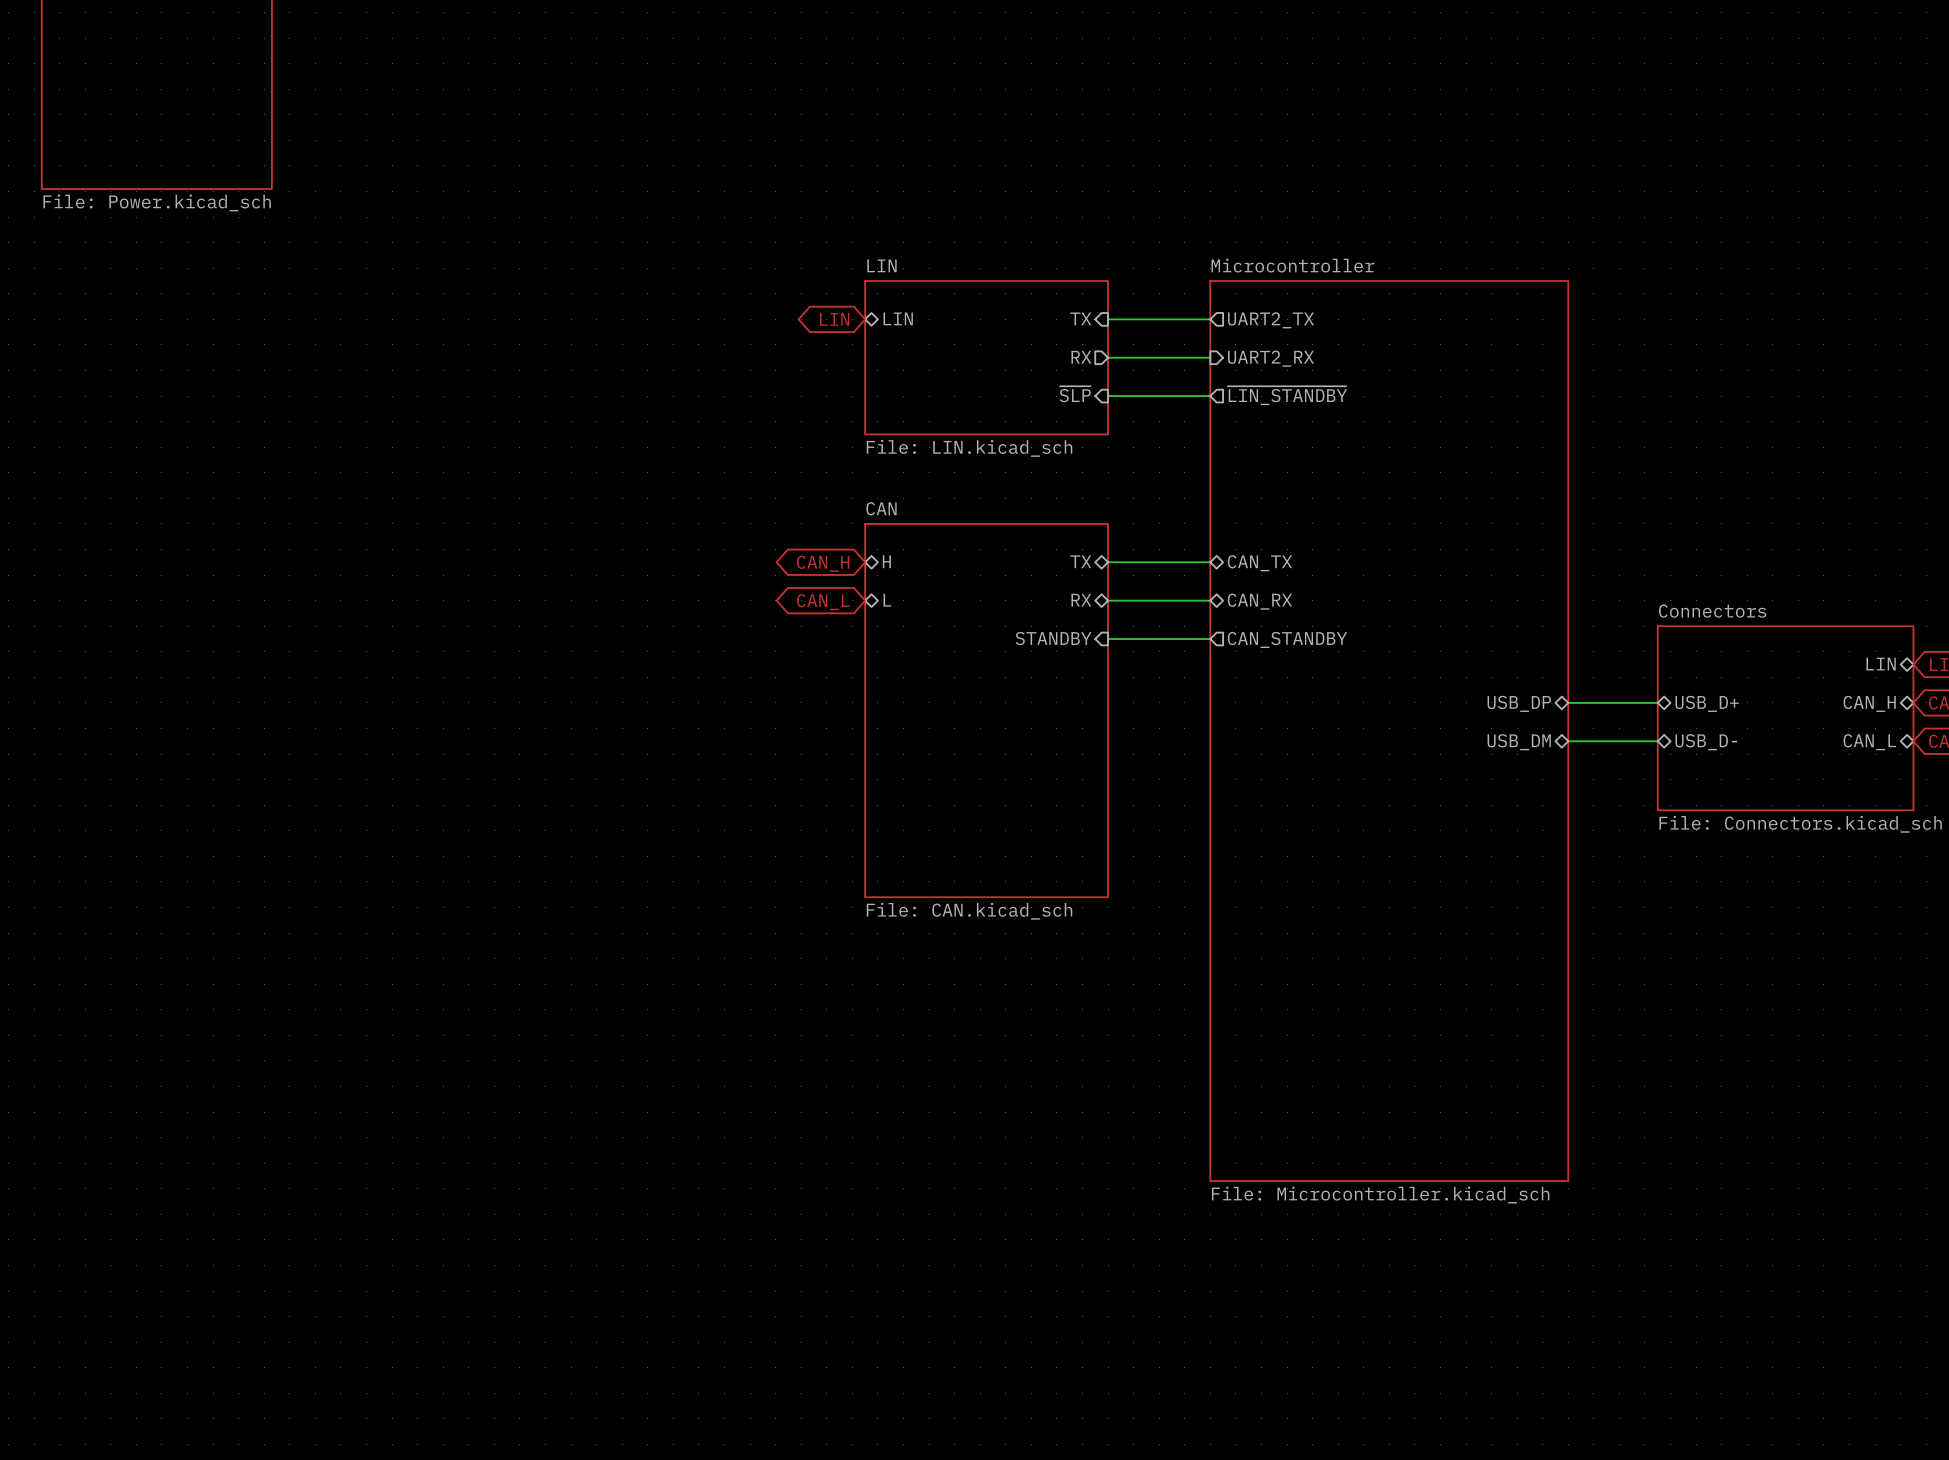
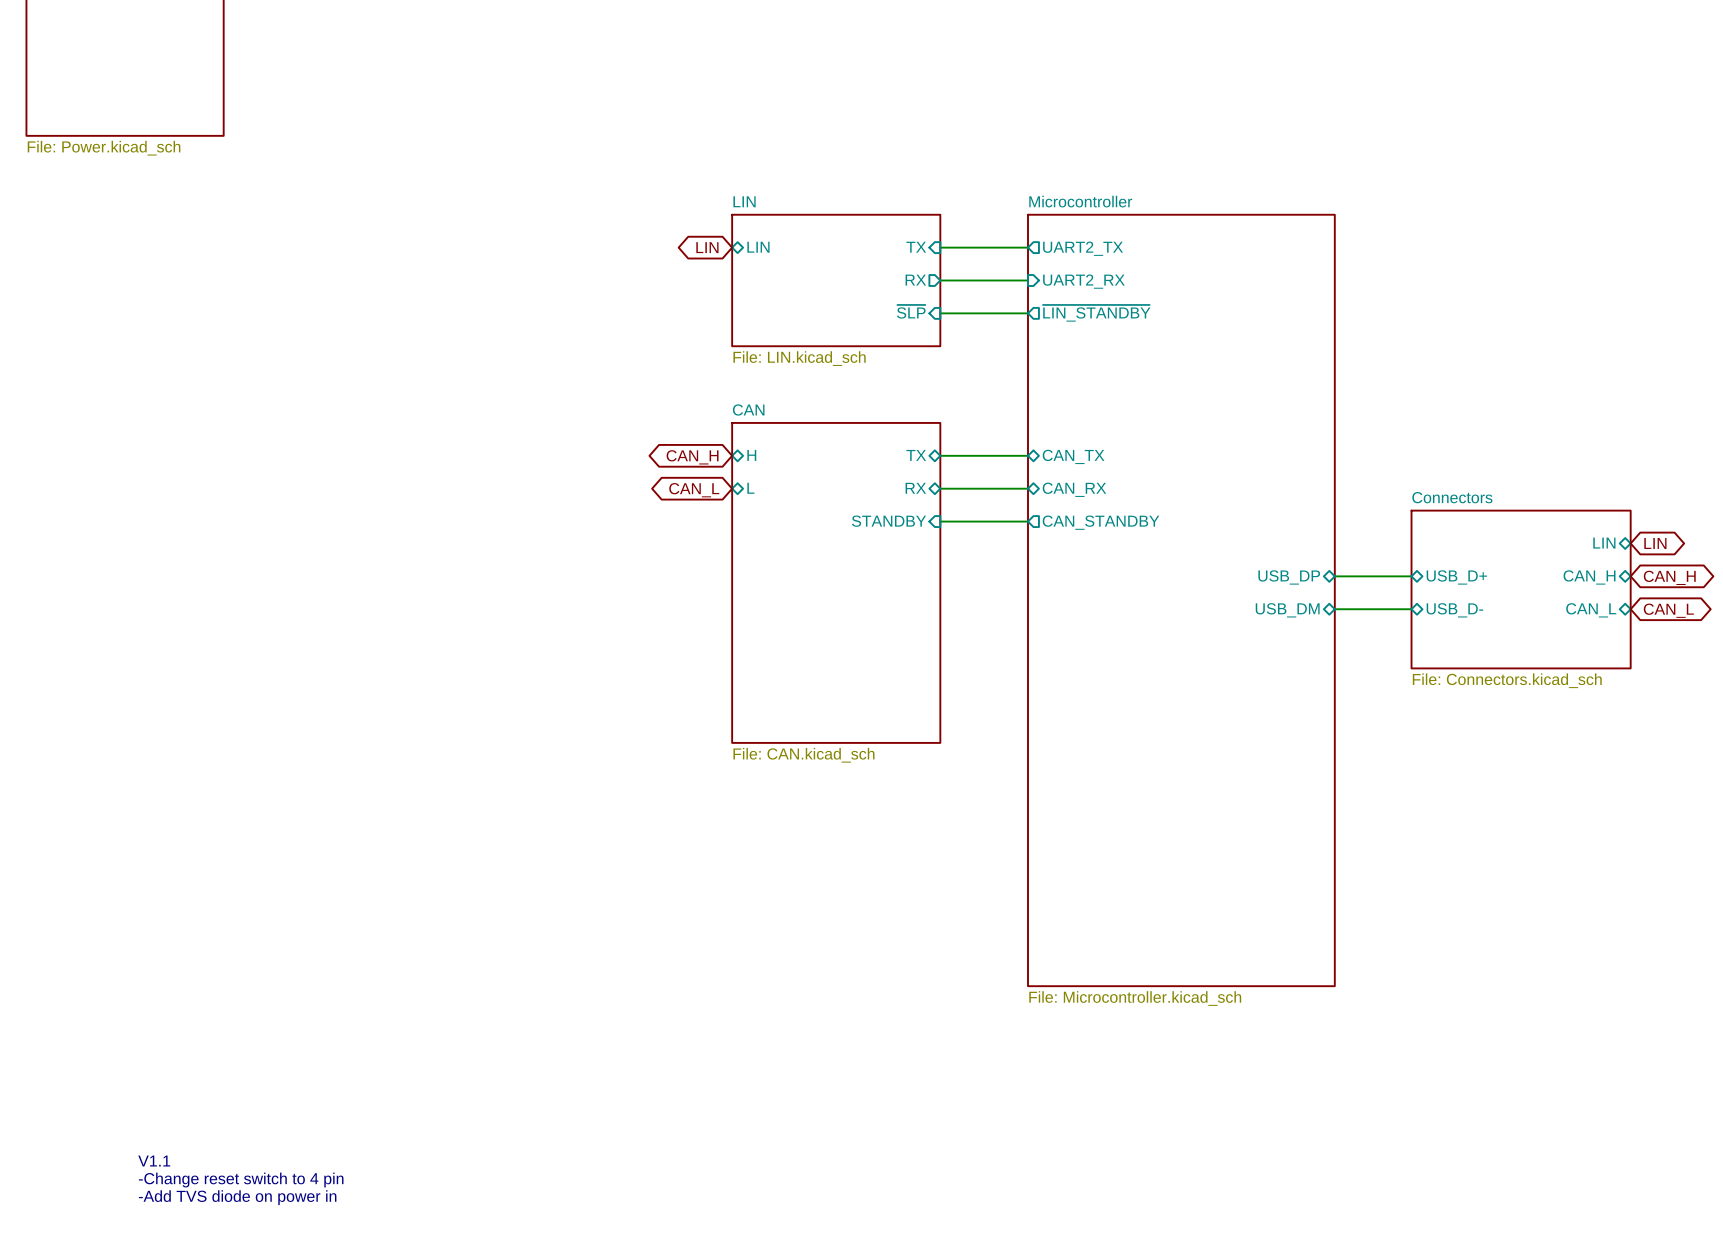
text: none -> V1.1 (154, 1161)
text: none -> -Change reset switch to 4 pin (241, 1180)
text: none -> -Add TVS diode on power in (237, 1197)

